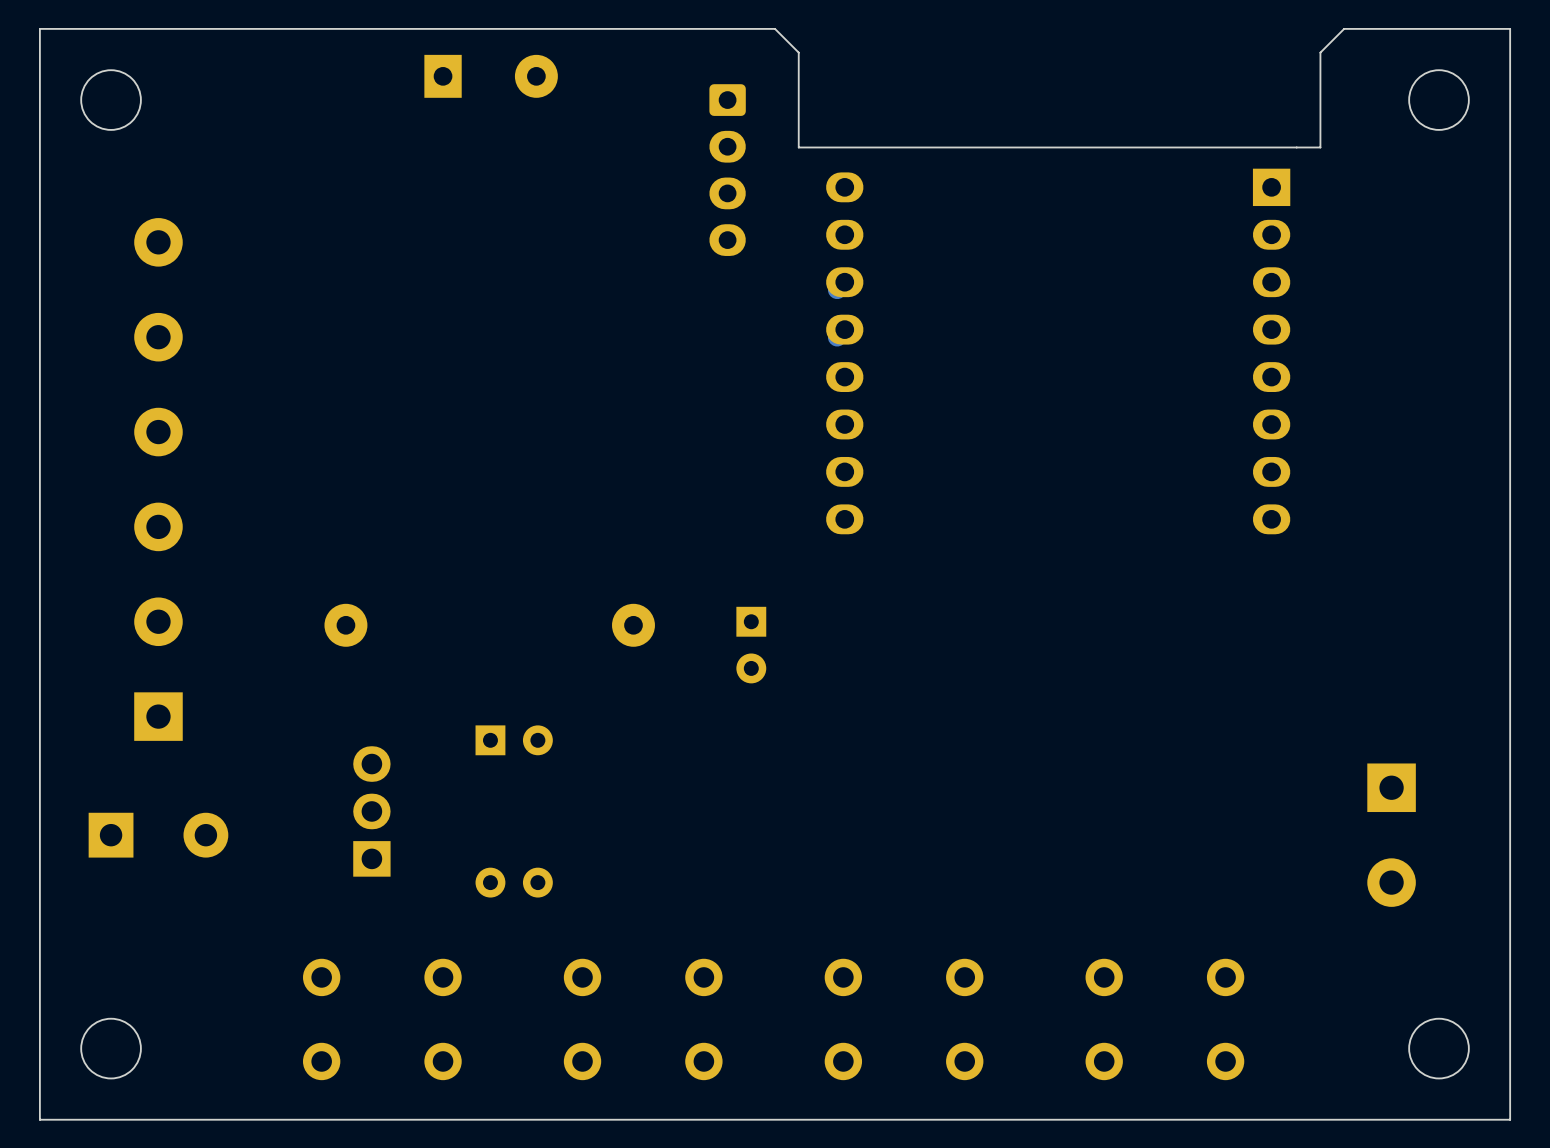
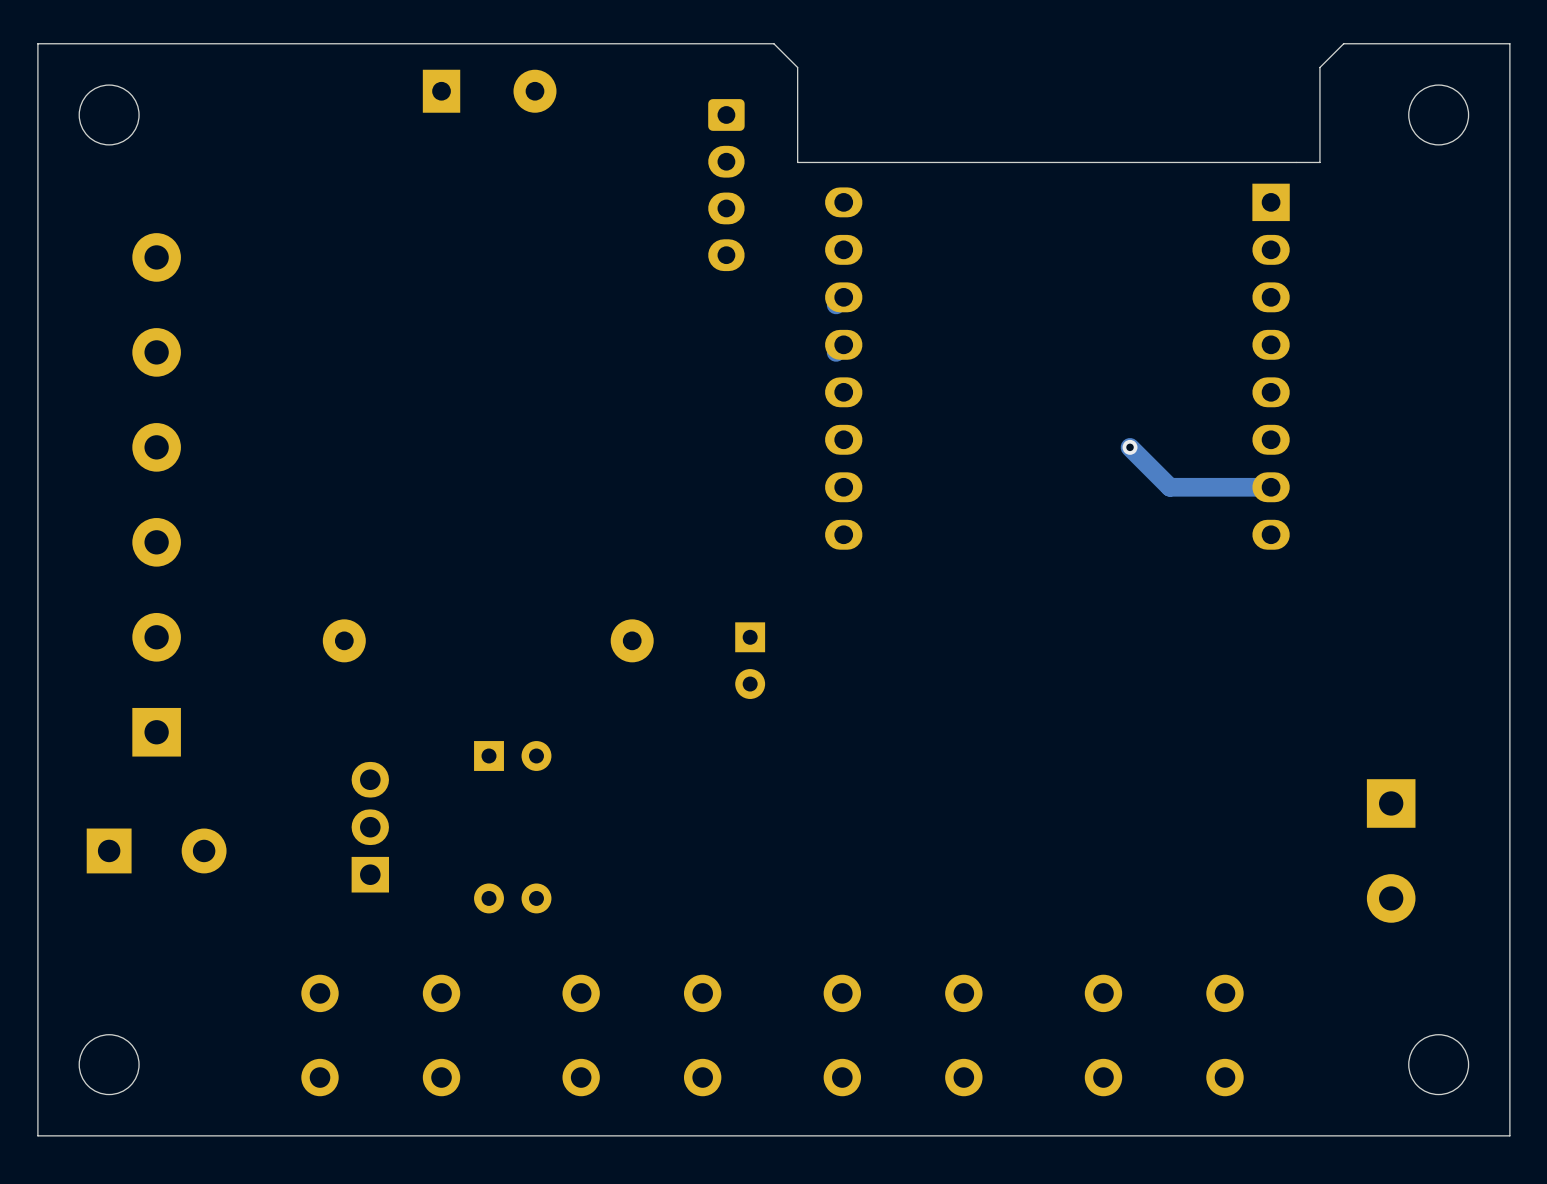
track: none -> (1130, 447) (1169, 487) (1271, 487)
via: none -> (1130, 447)

